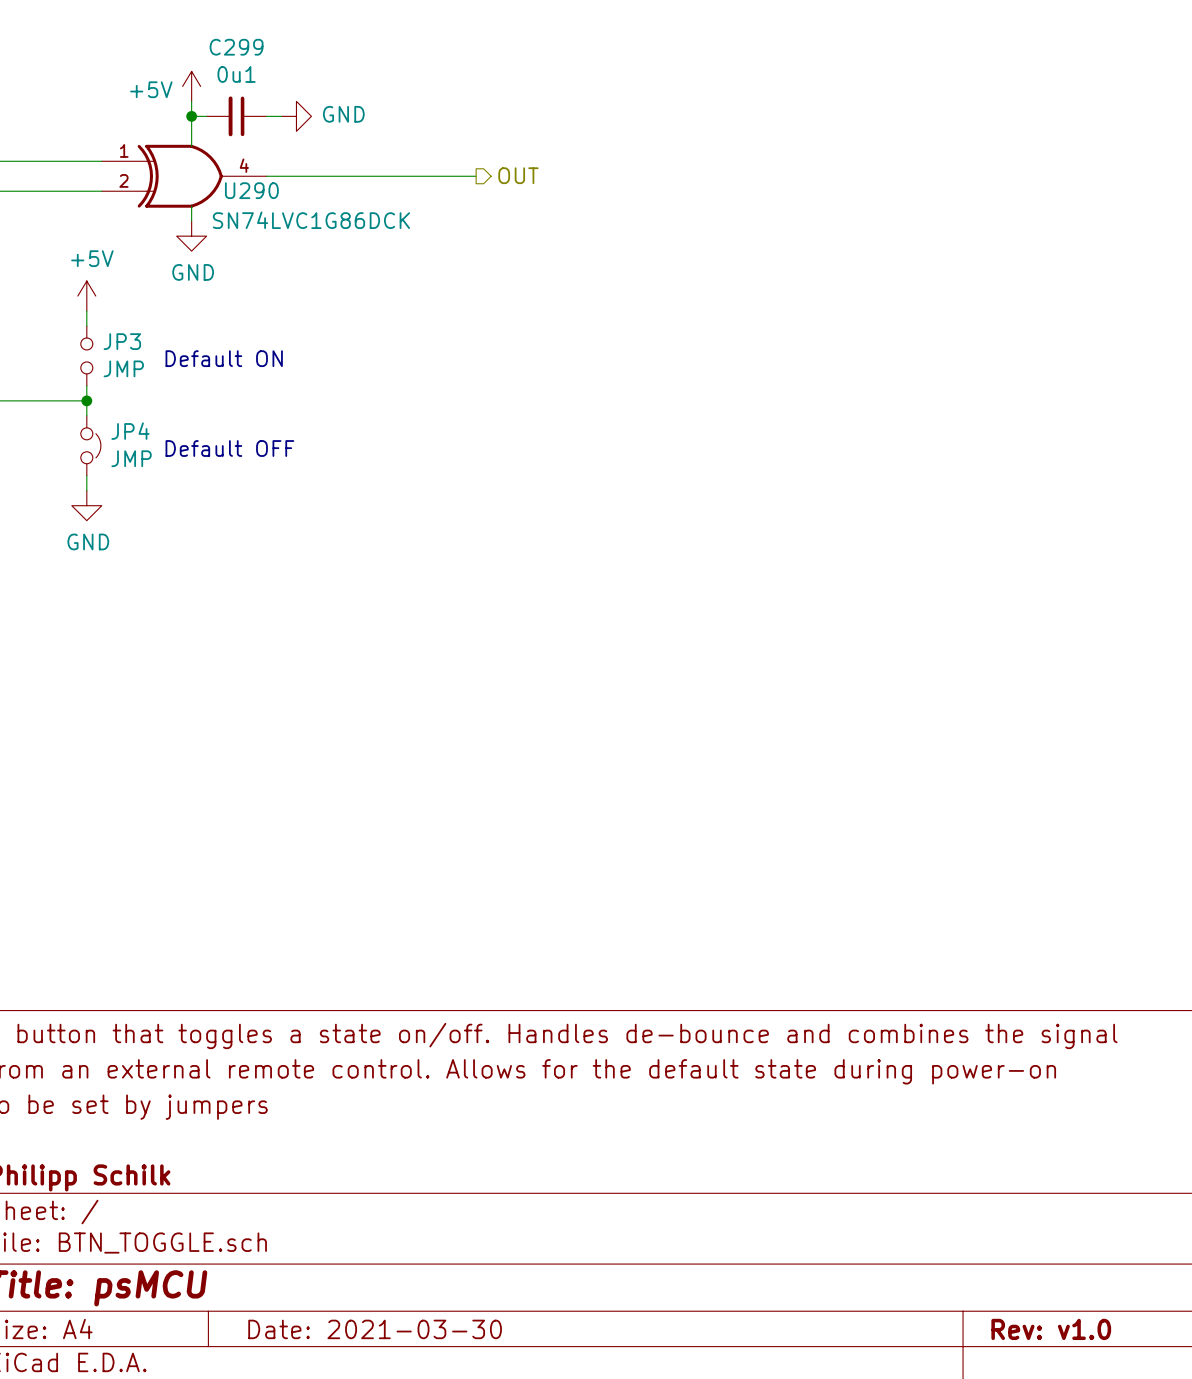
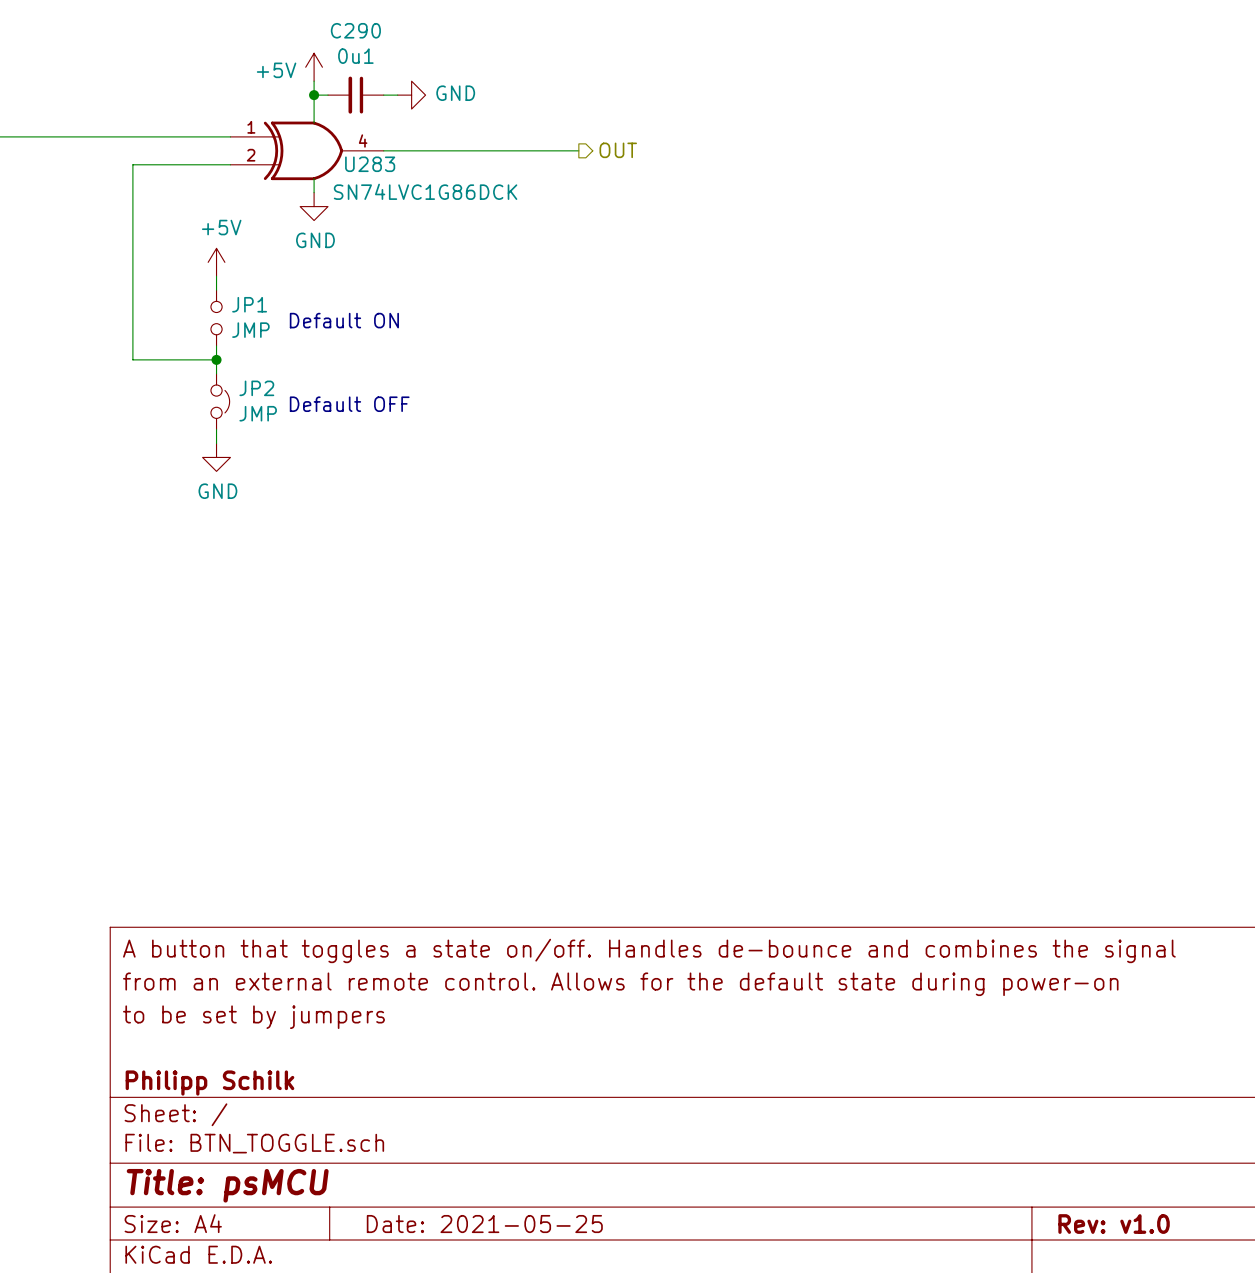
C299 name: C299 (236, 47) -> C290 (355, 30)
U290 name: U290 (251, 190) -> U283 (370, 164)
JP3 name: JP3 (122, 341) -> JP1 (249, 304)
JP4 name: JP4 (130, 431) -> JP2 (256, 388)
title block: Date: 2021-03-30 (375, 1329) -> Date: 2021-05-25 (484, 1224)

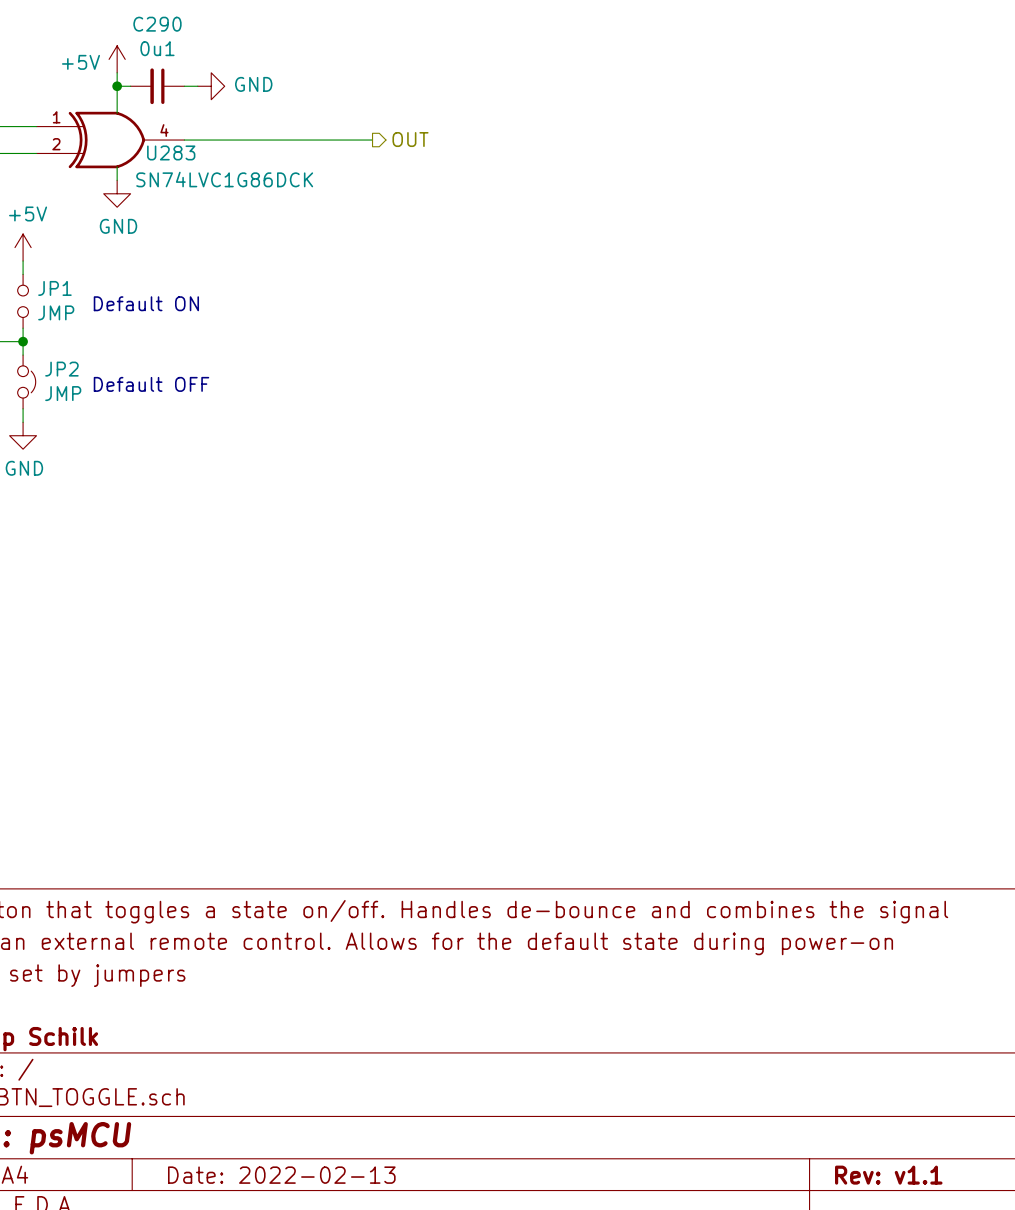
title block: Date: 2021-05-25 (484, 1224) -> Date: 2022-02-13 (281, 1175)
title block: Rev: v1.0 (1114, 1224) -> Rev: v1.1 (888, 1175)

